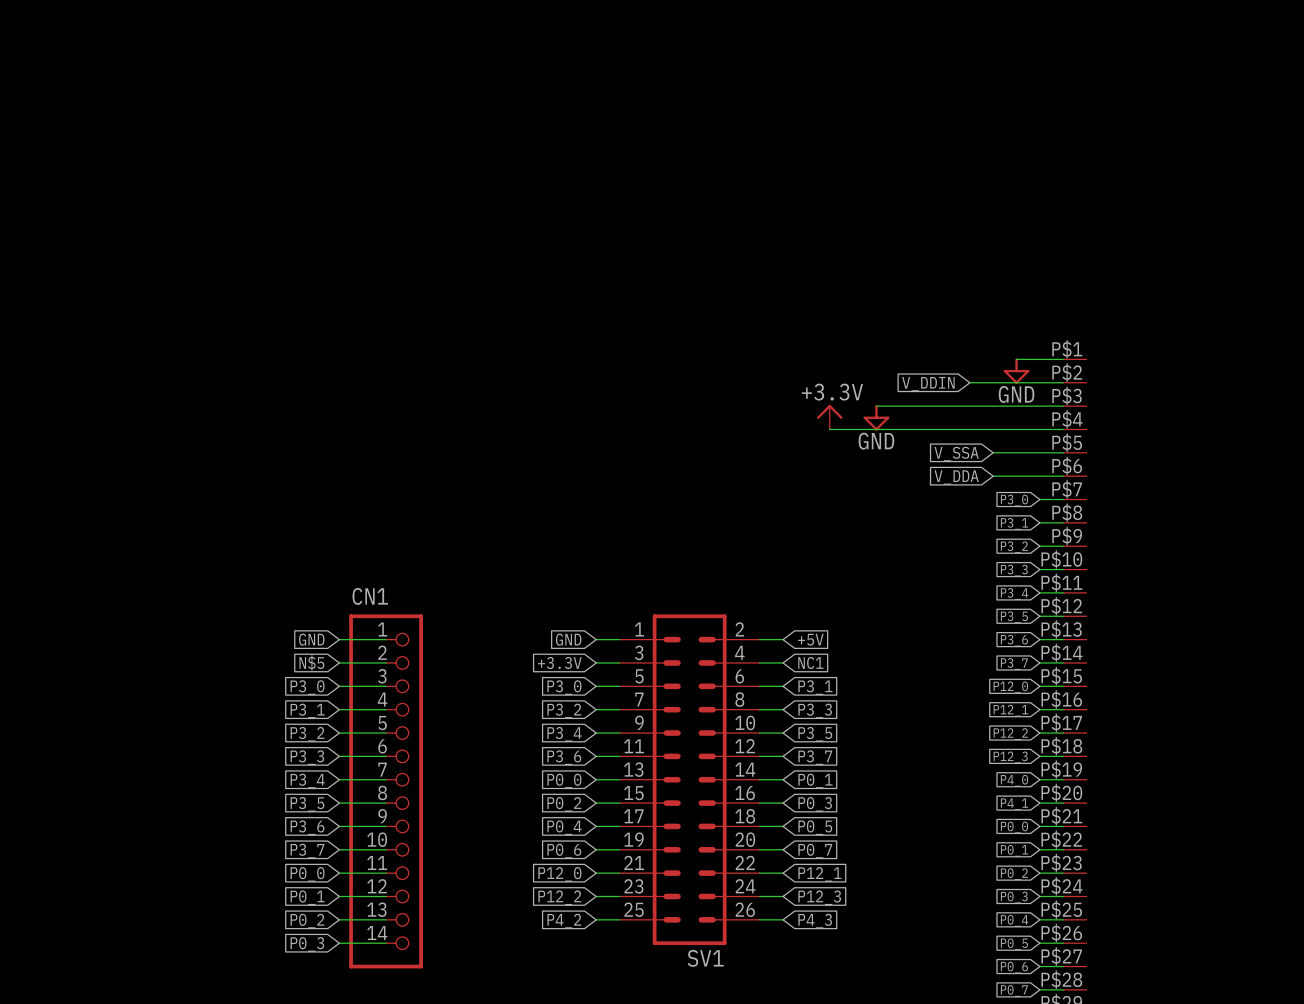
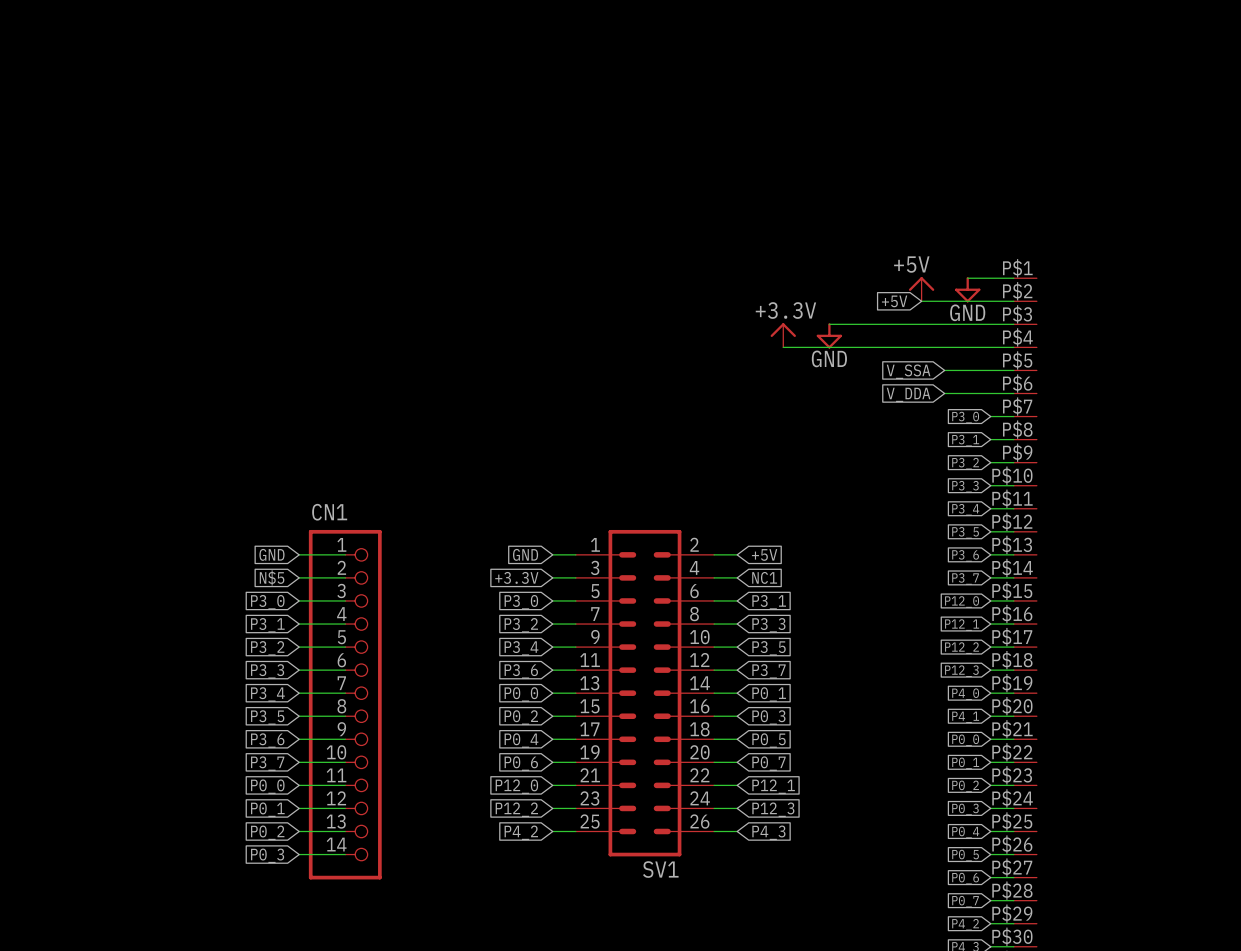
power symbol: none -> +5V (921, 289)
global label: V_DDIN (928, 384) -> +5V (894, 301)

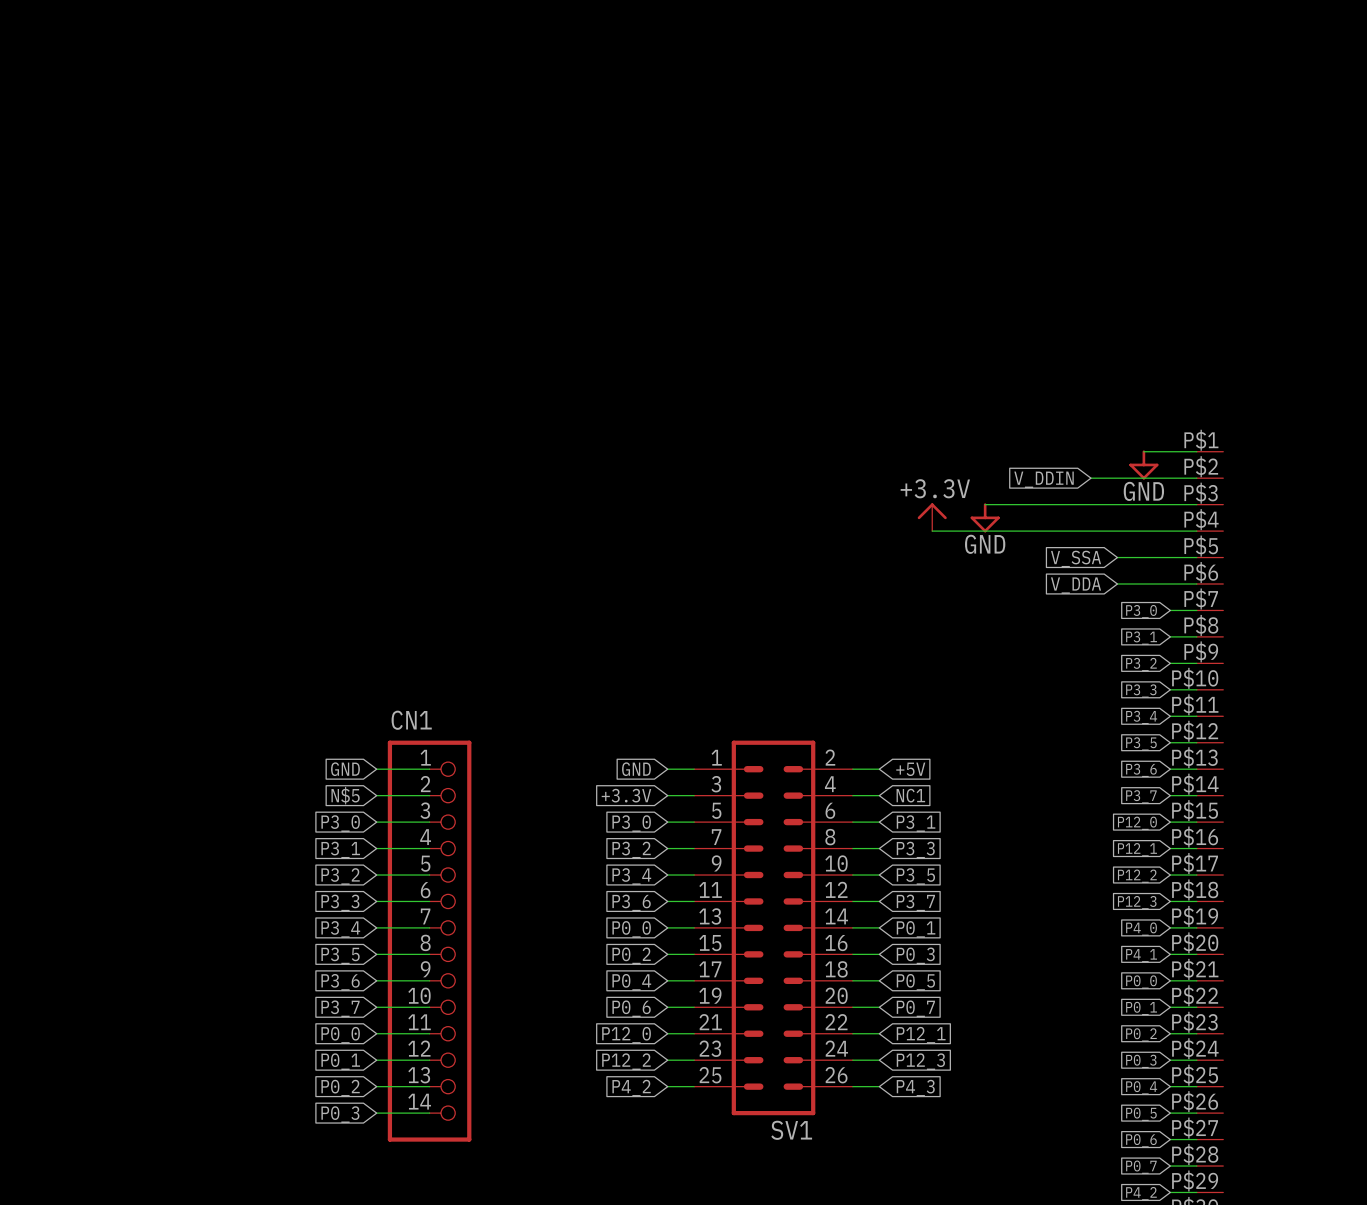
power symbol: +5V (921, 289) -> none
global label: +5V (894, 301) -> V_DDIN (1044, 479)

